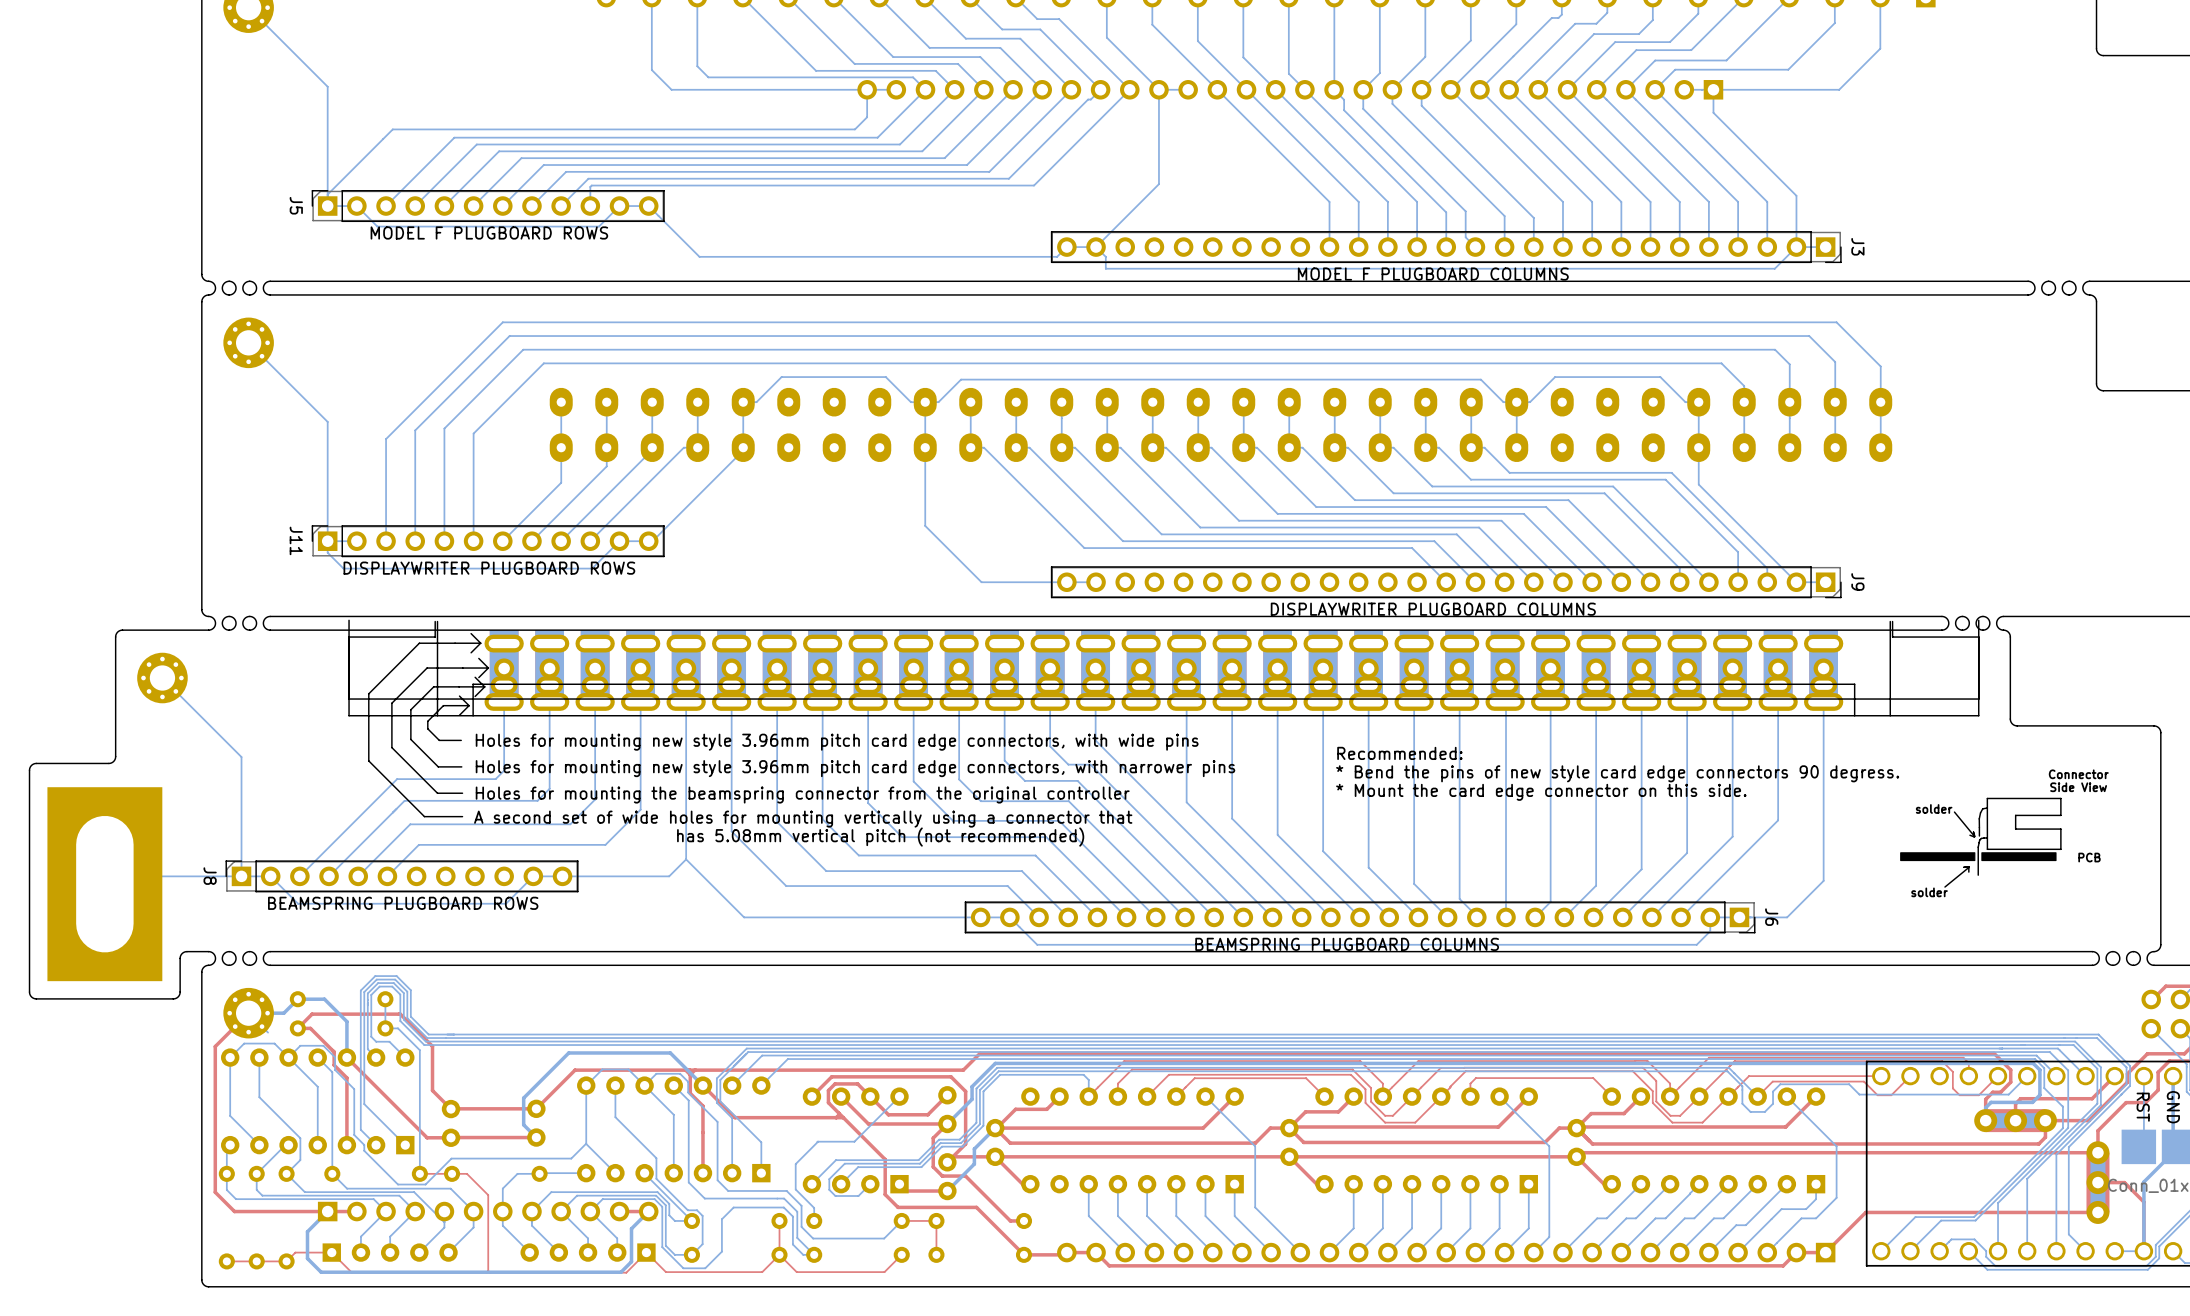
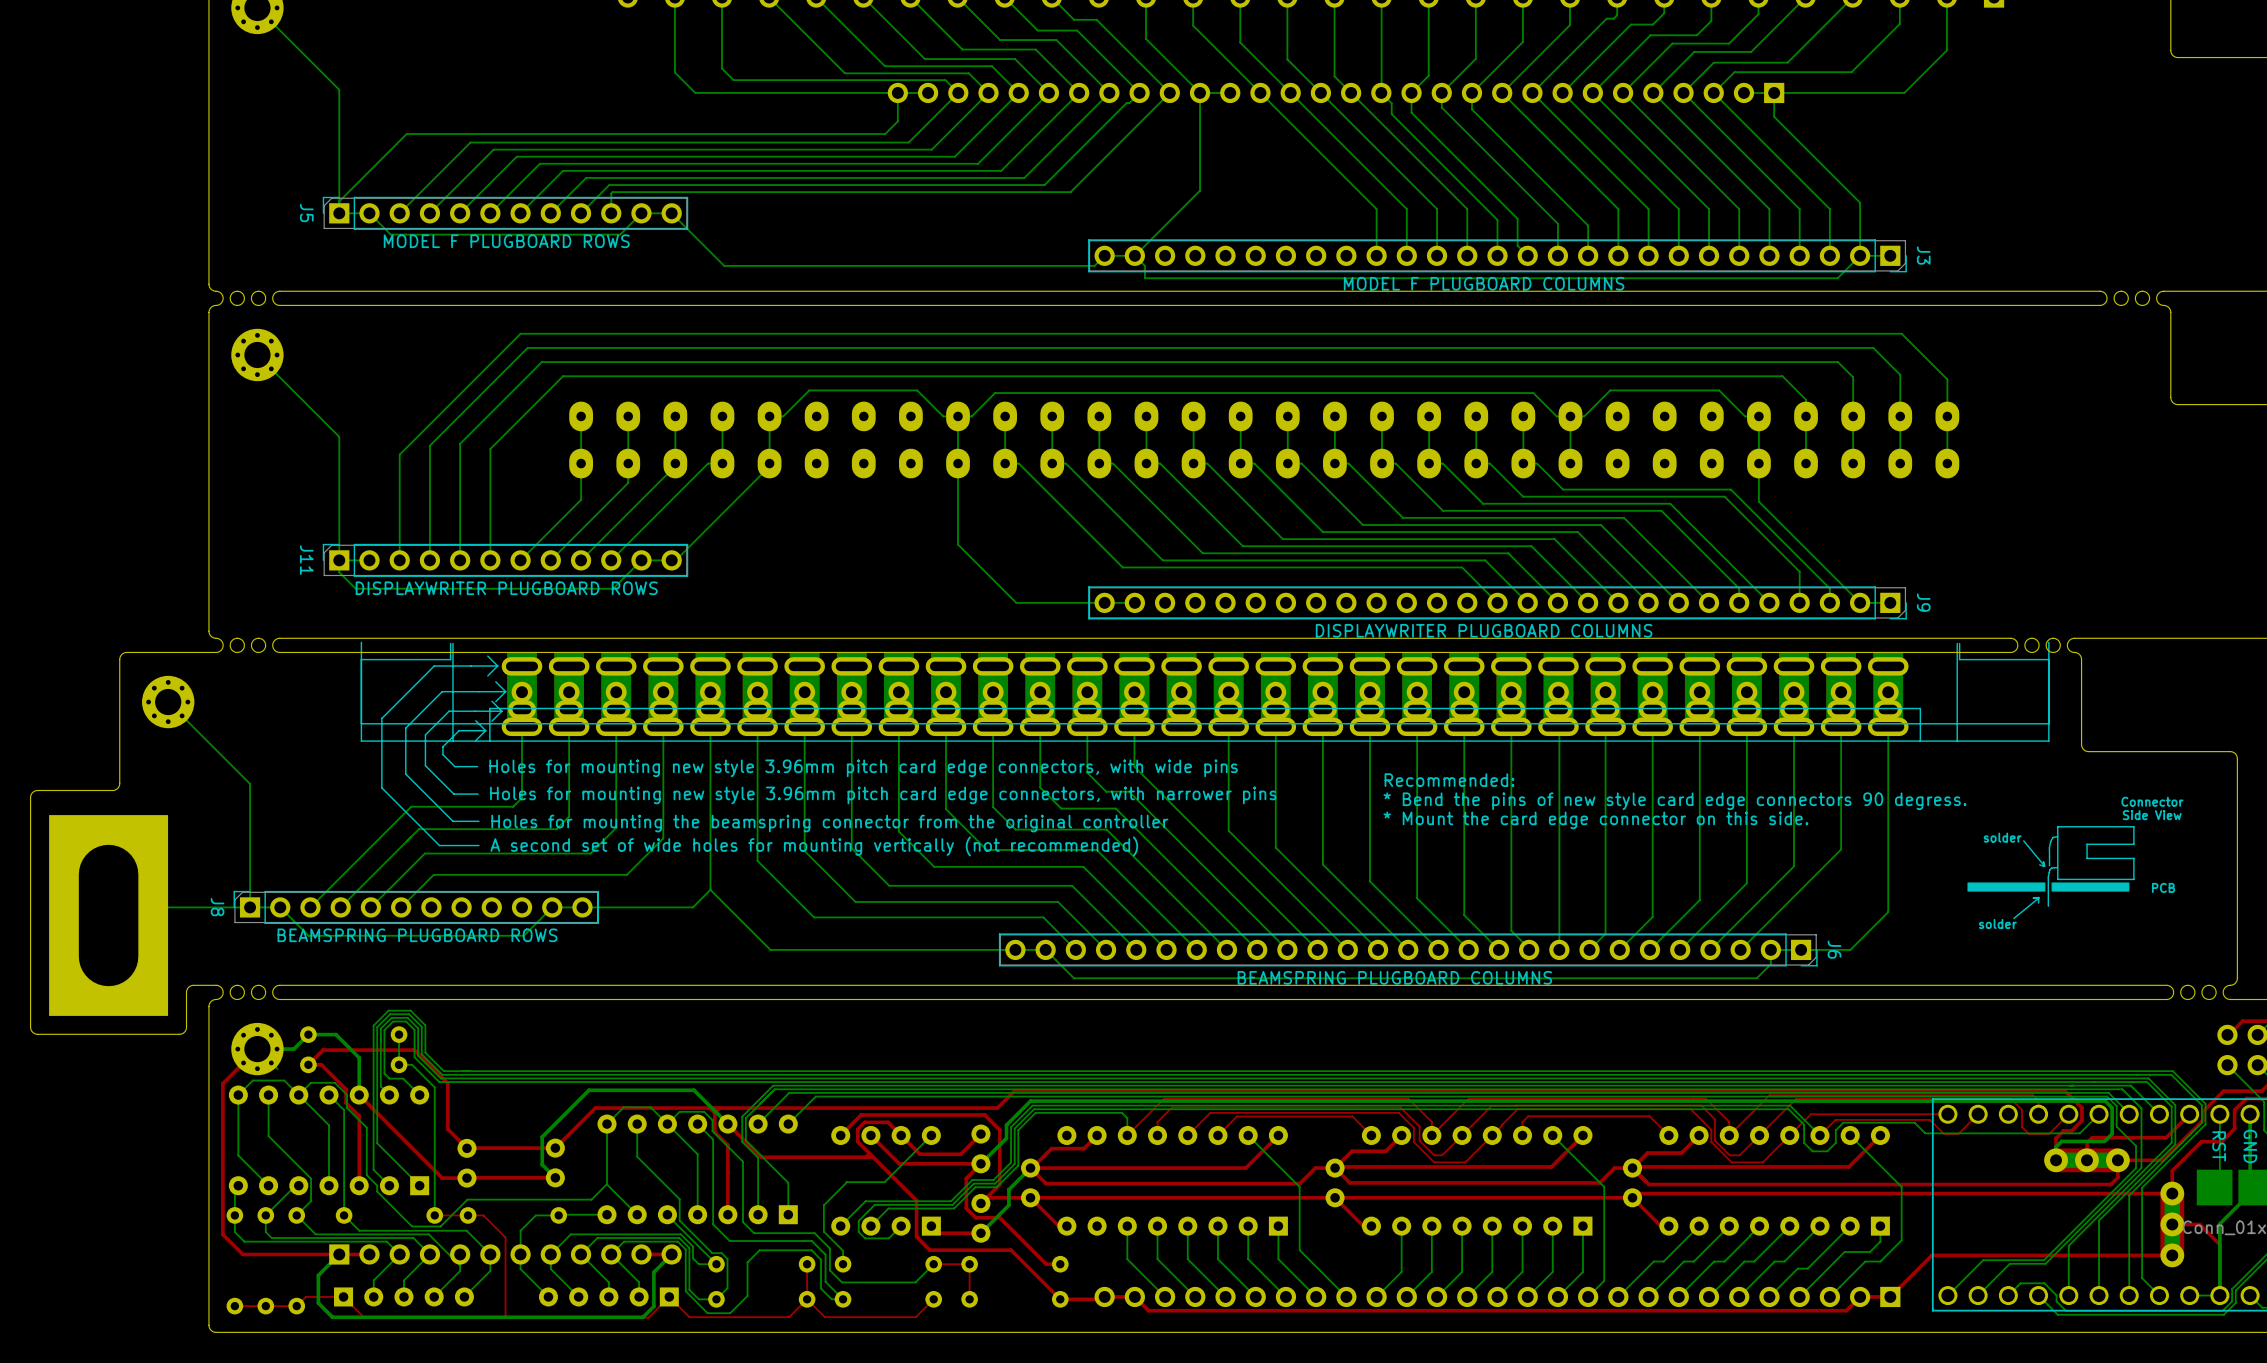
text: none -> Holes for mounting new style 3.96mm pitch card edge connectors, with wide pins (863, 768)
text: Holes for mounting new style 3.96mm pitch card edge connectors, with wide pins (837, 742) -> none
text: none -> Holes for mounting new style 3.96mm pitch card edge connectors, with narrower pins (883, 795)
text: Holes for mounting new style 3.96mm pitch card edge connectors, with narrower pins (855, 768) -> none
text: none -> Holes for mounting the beamspring connector from the original controller (829, 823)
text: Holes for mounting the beamspring connector from the original controller (802, 795) -> none
text: none -> A second set of wide holes for mounting vertically (not recommended) (814, 846)
text: A second set of wide holes for mounting vertically using a connector that (803, 819) -> none
text: has 5.08mm vertical pitch (not recommended) (880, 837) -> none

